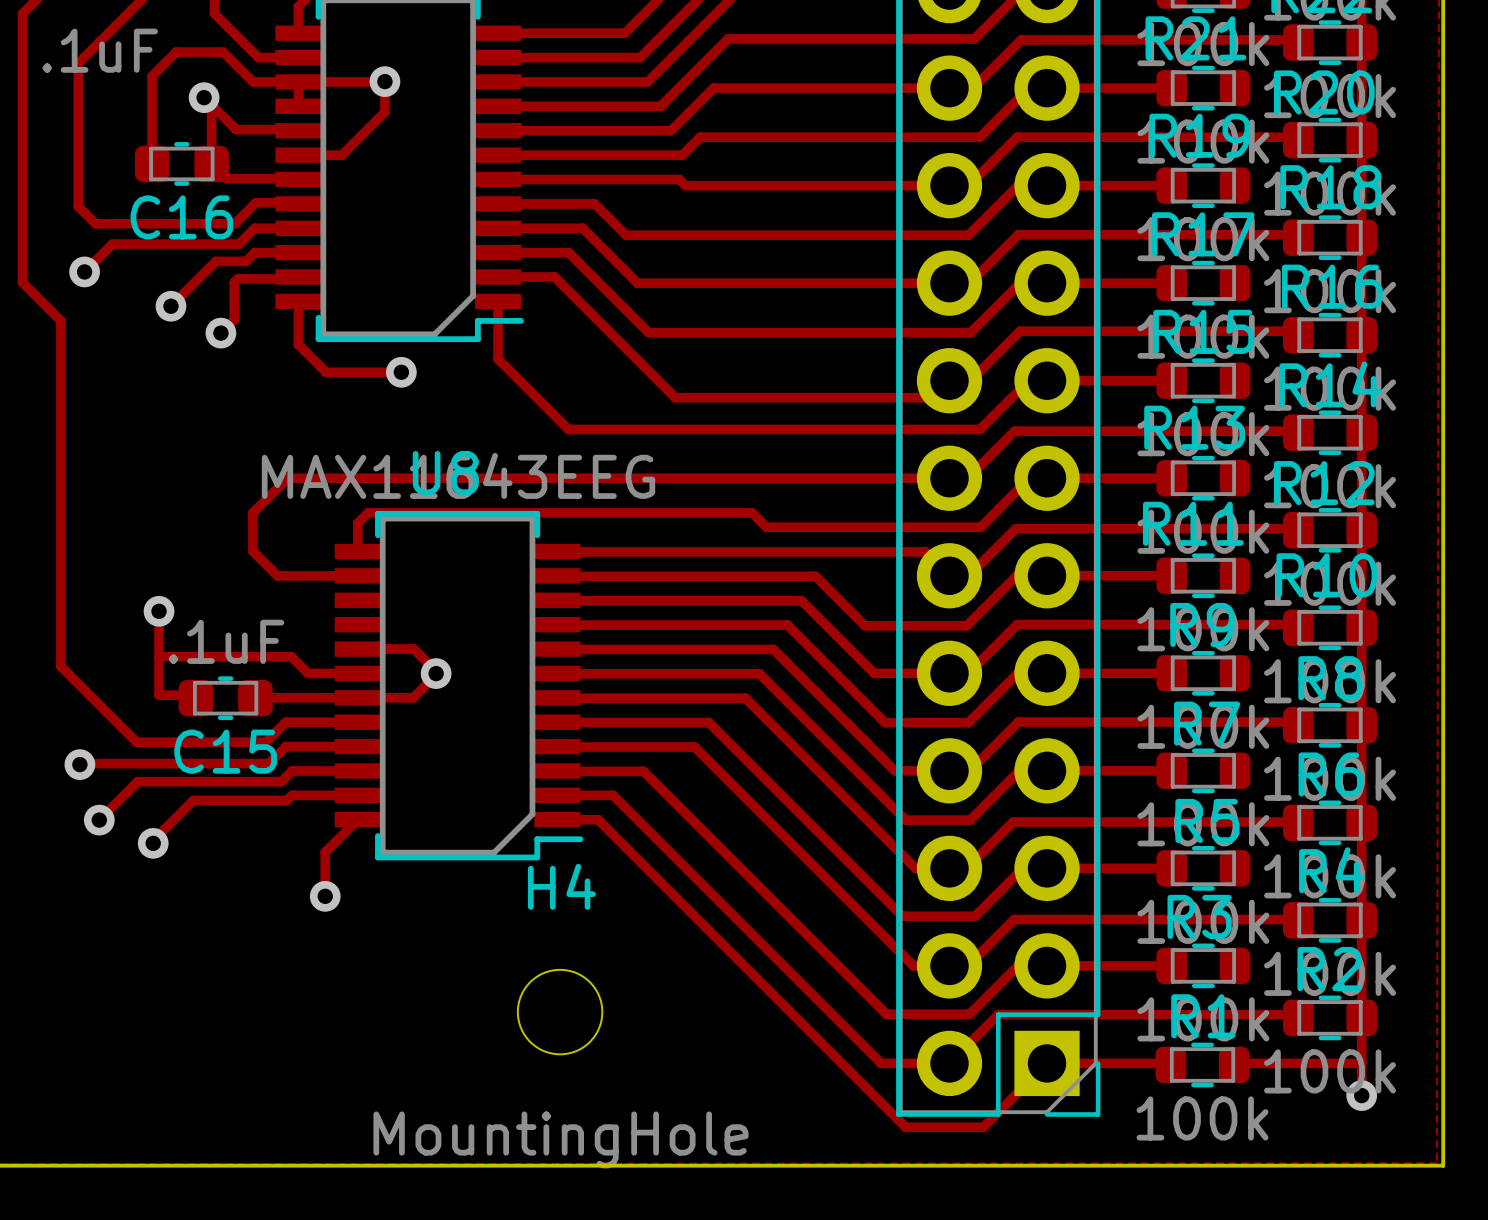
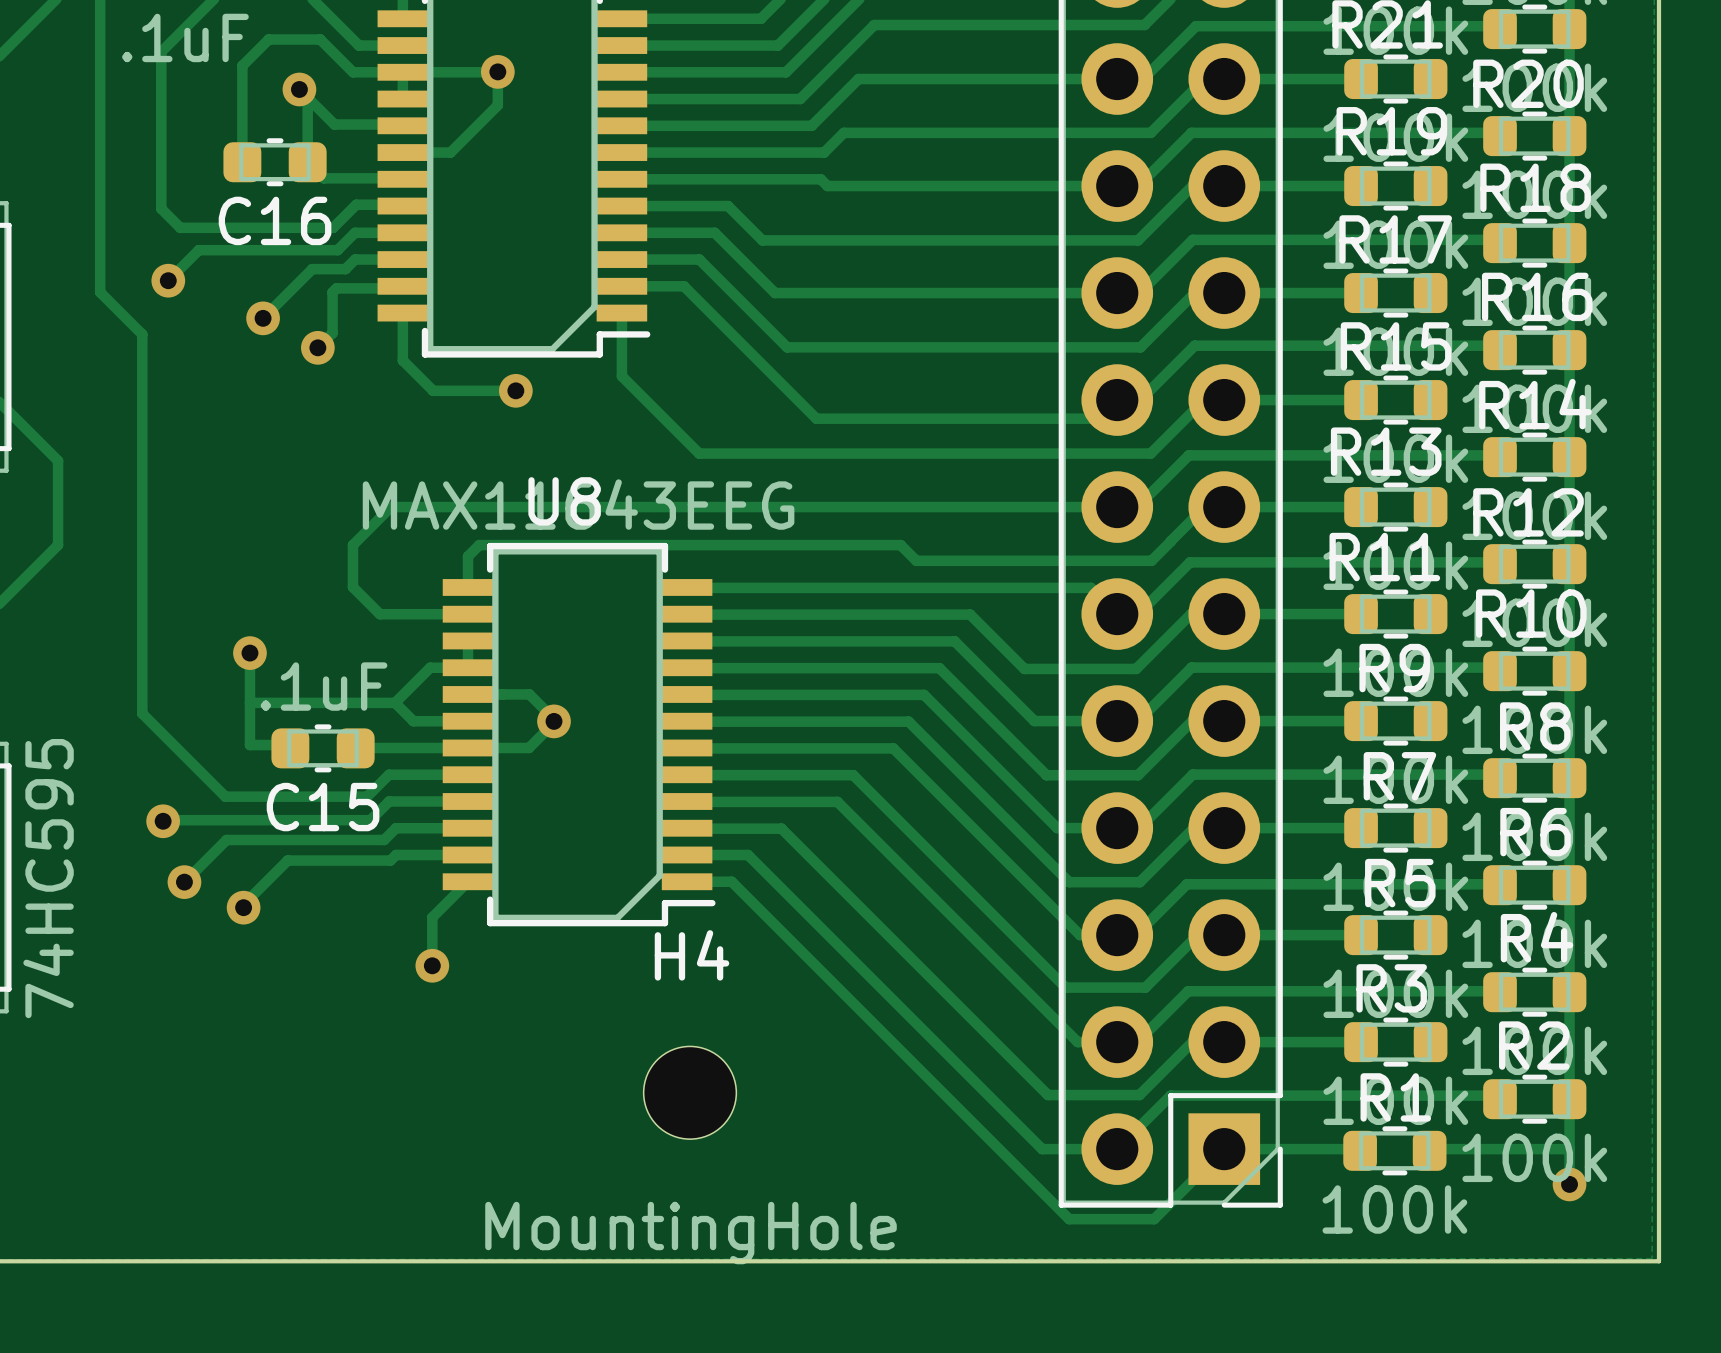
track: none -> (468, 640) (468, 667) (430, 667) (395, 702)

